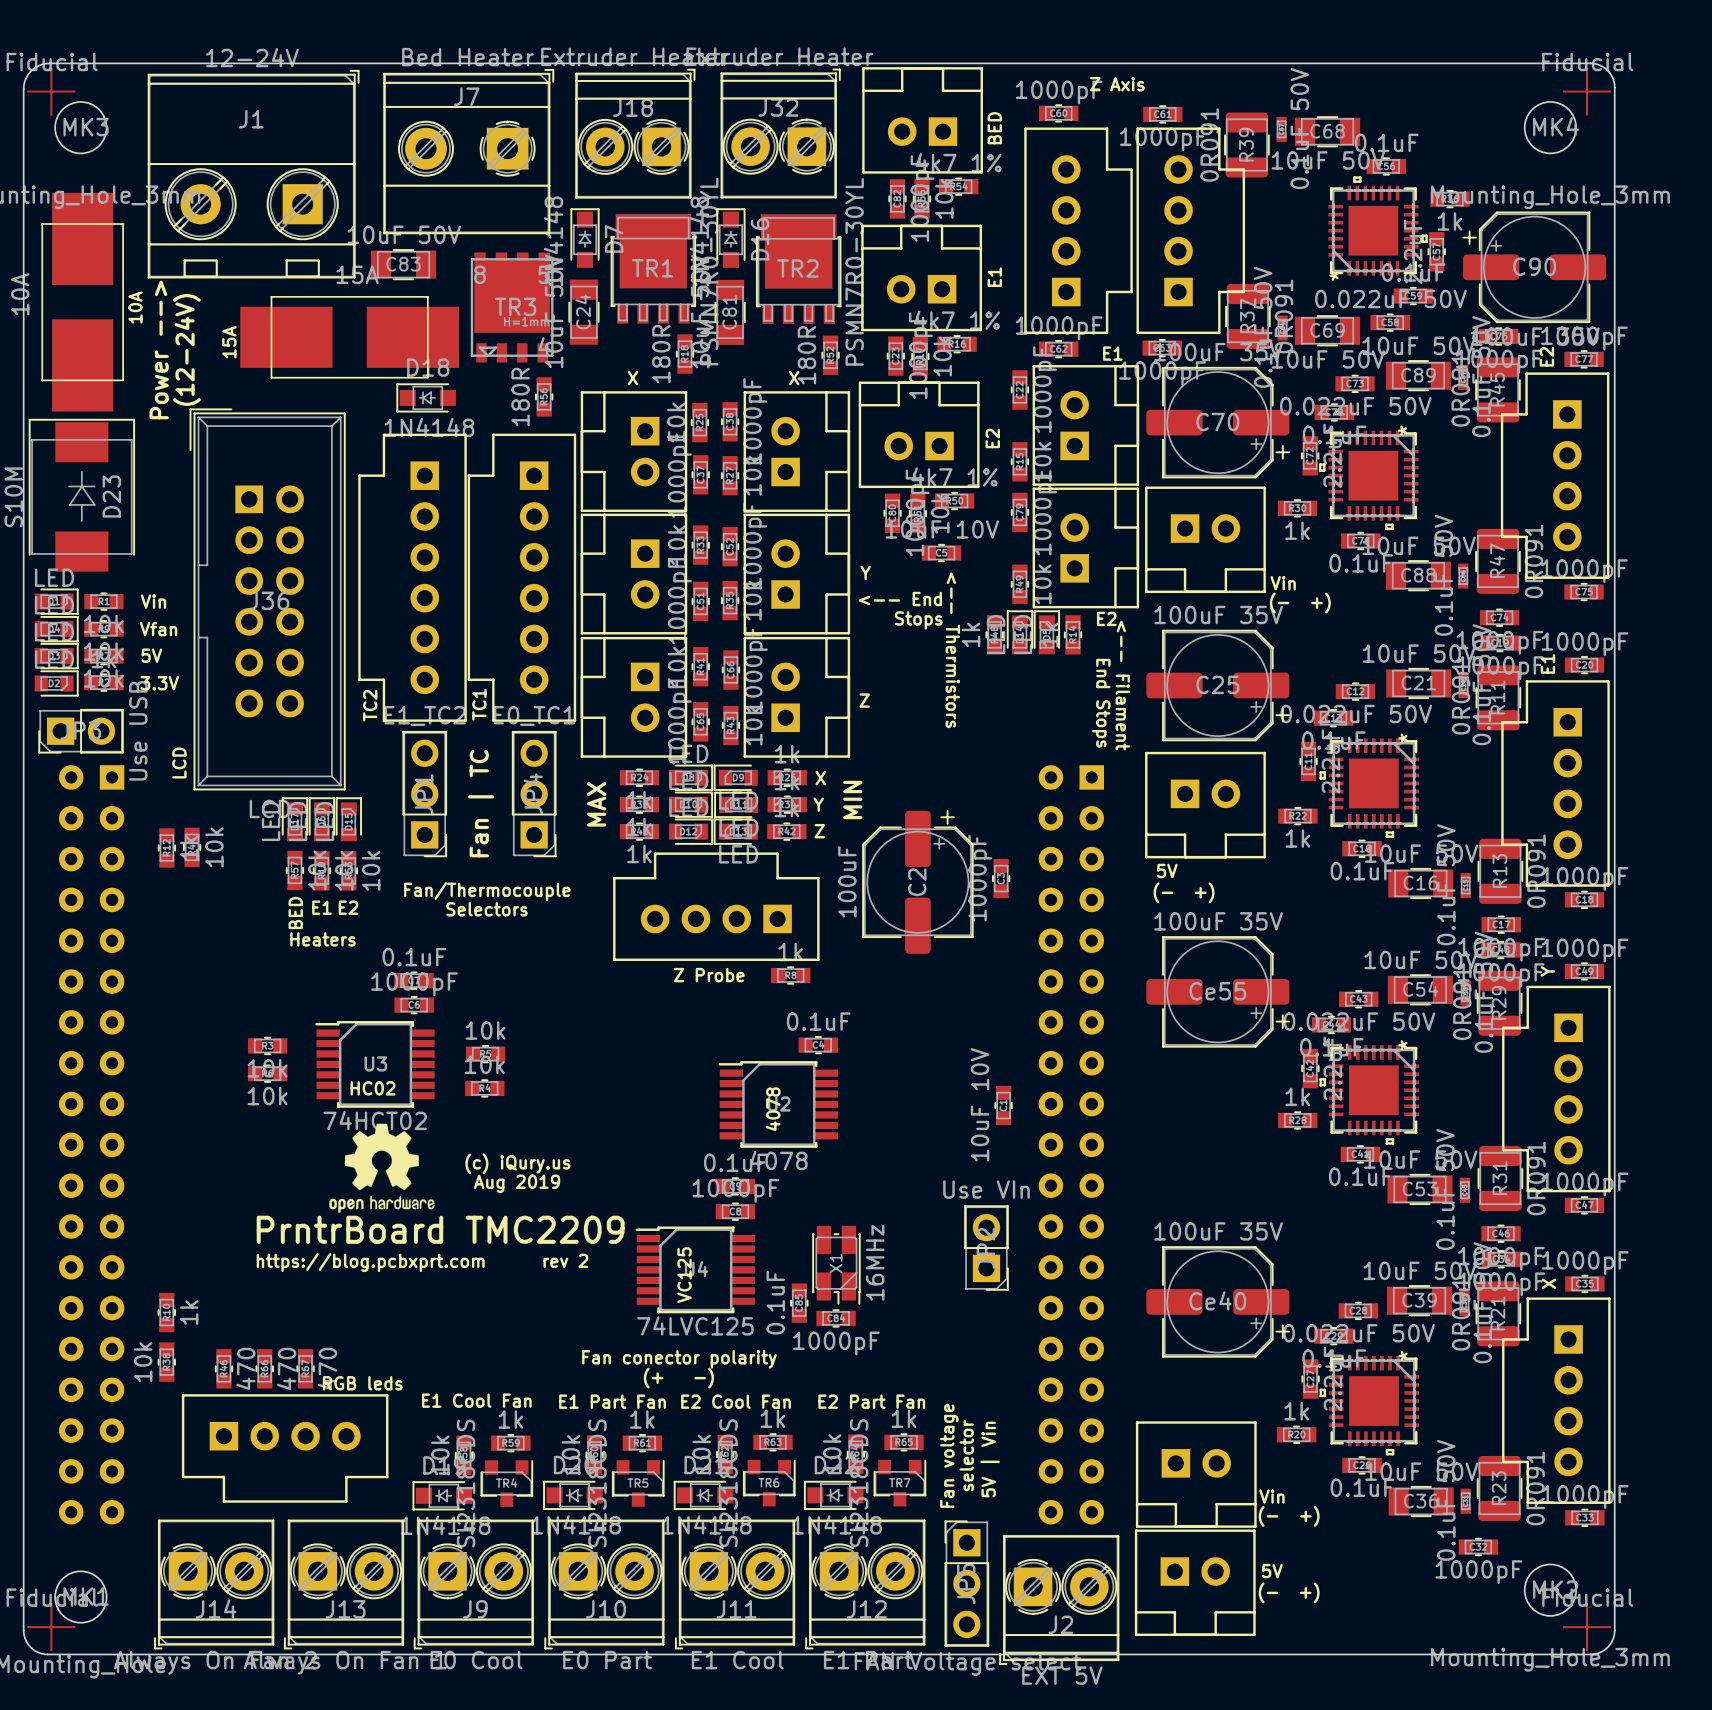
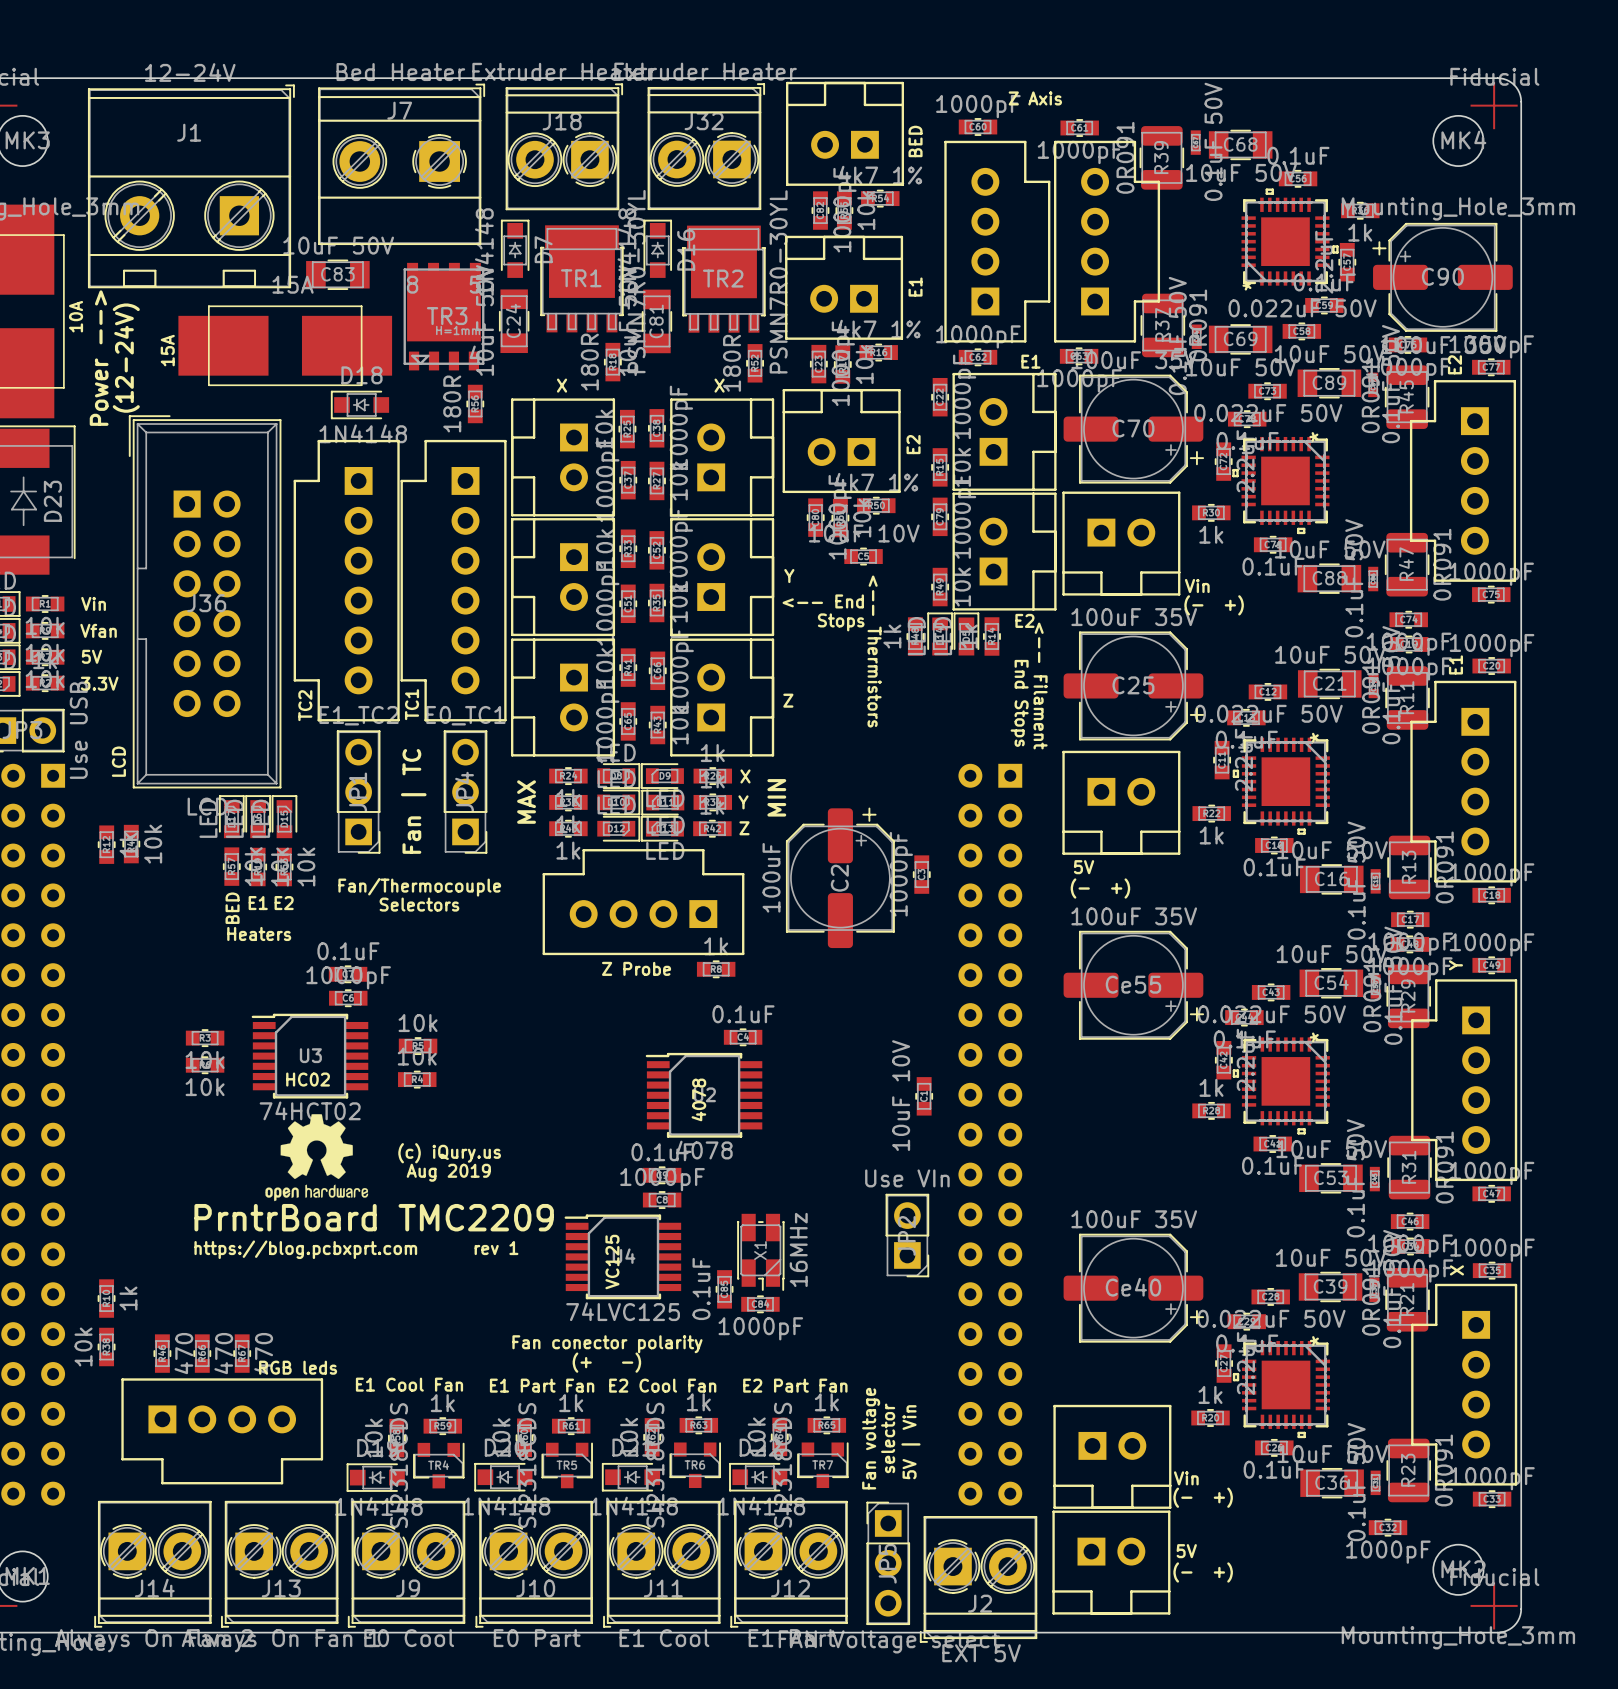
text: rev 2 (565, 1260) -> rev 1 (496, 1248)

